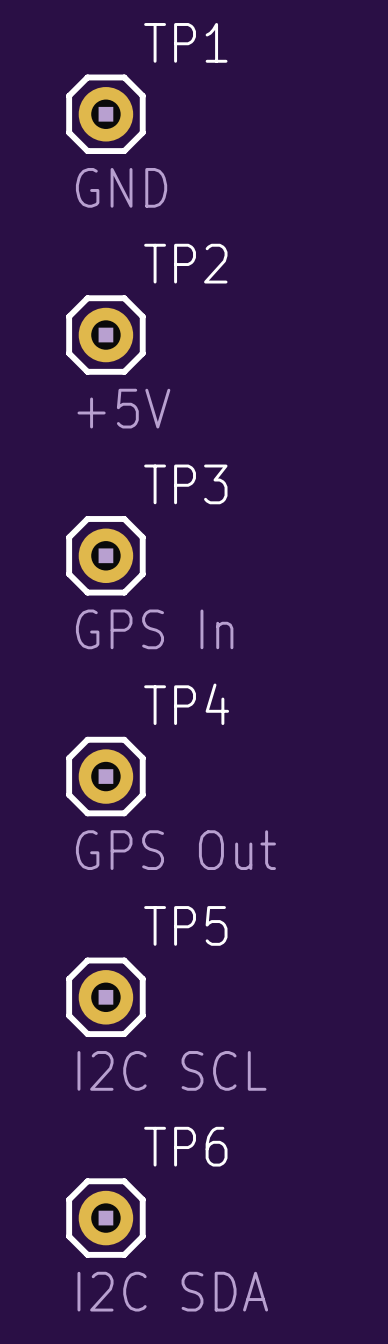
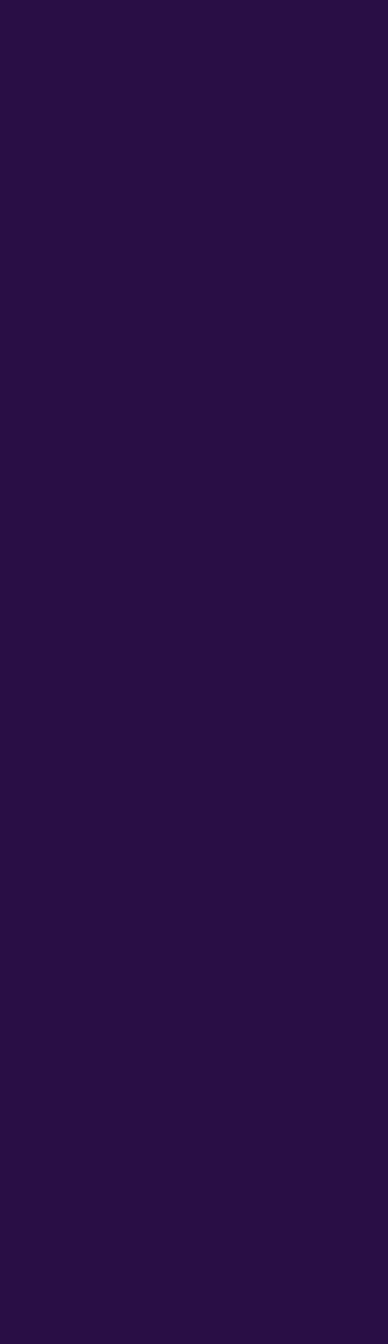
TP1: GND (105, 114) -> none
TP2: +5V (105, 335) -> none
TP3: GPS In (105, 555) -> none
TP4: GPS Out (105, 776) -> none
TP5: I2C SCL (105, 997) -> none
TP6: I2C SDA (105, 1218) -> none

